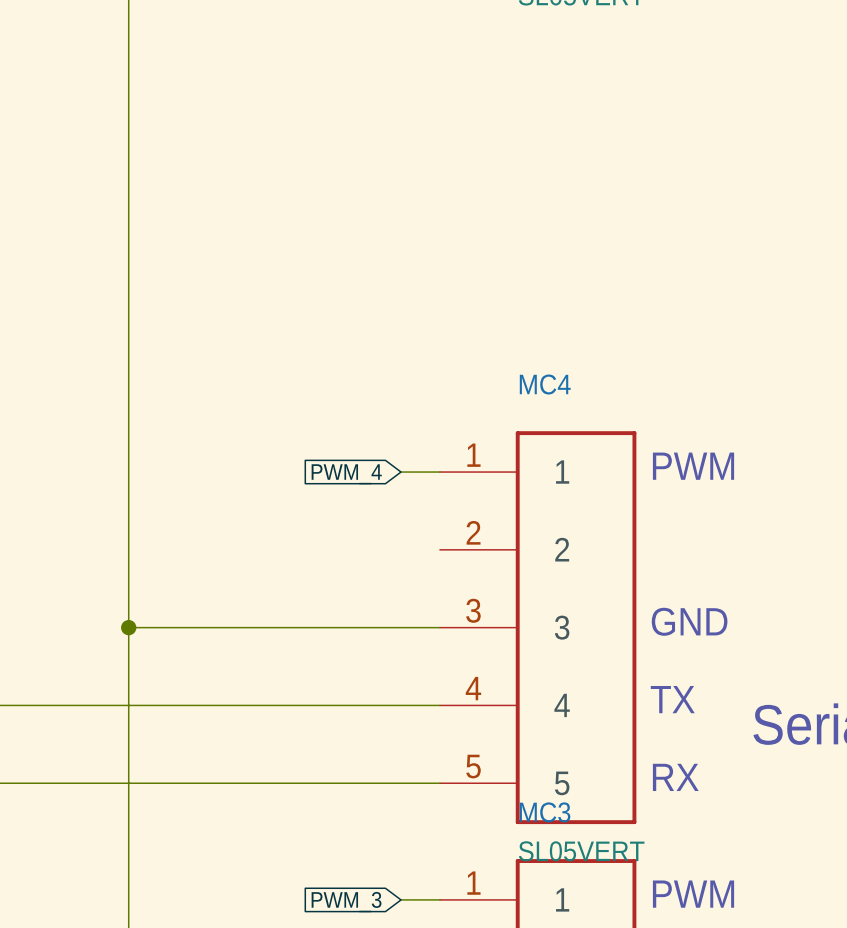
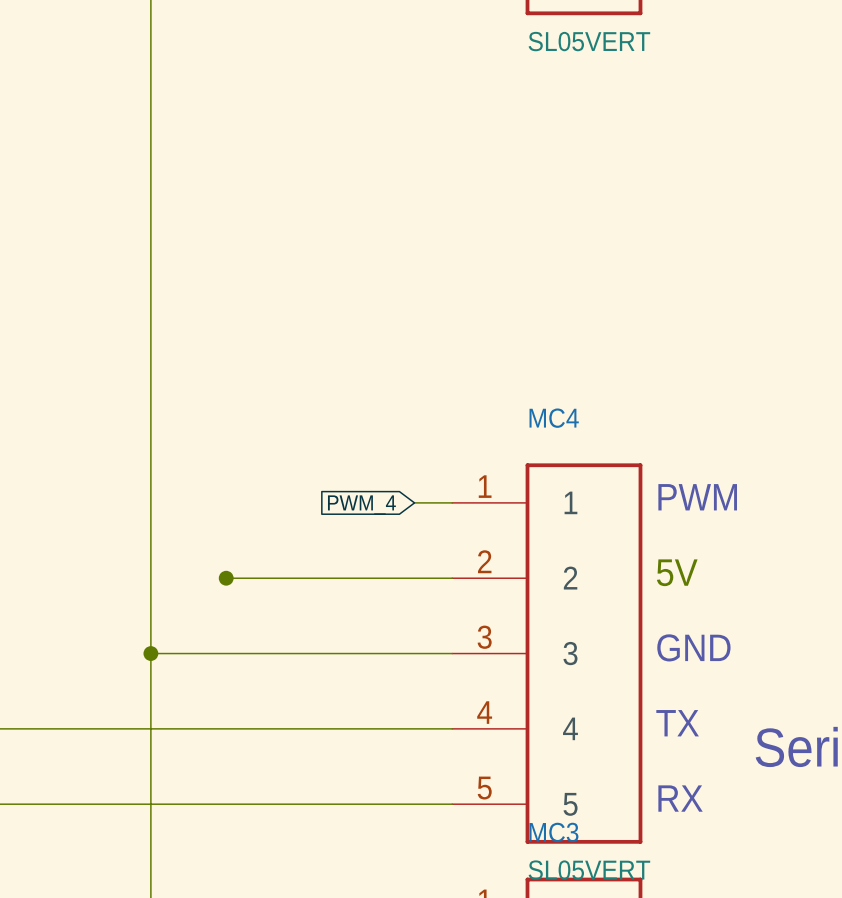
text: none -> 5V (677, 572)
wire: none -> (226, 578) (452, 578)
junction: none -> (226, 578)

